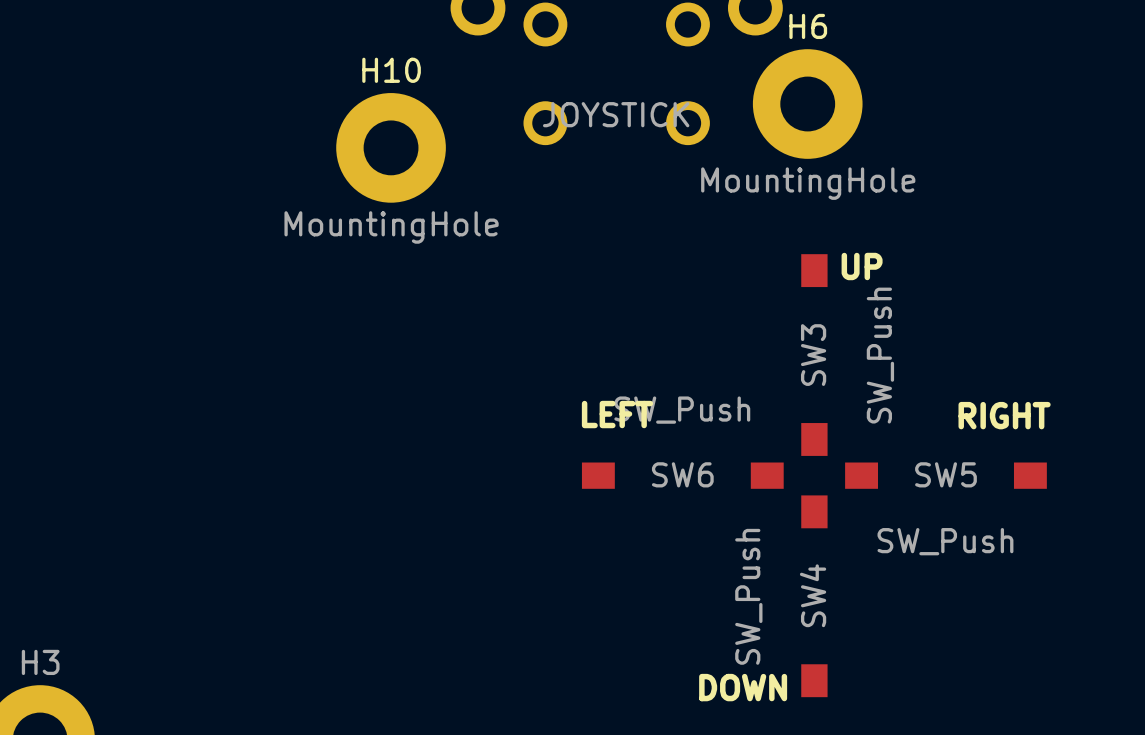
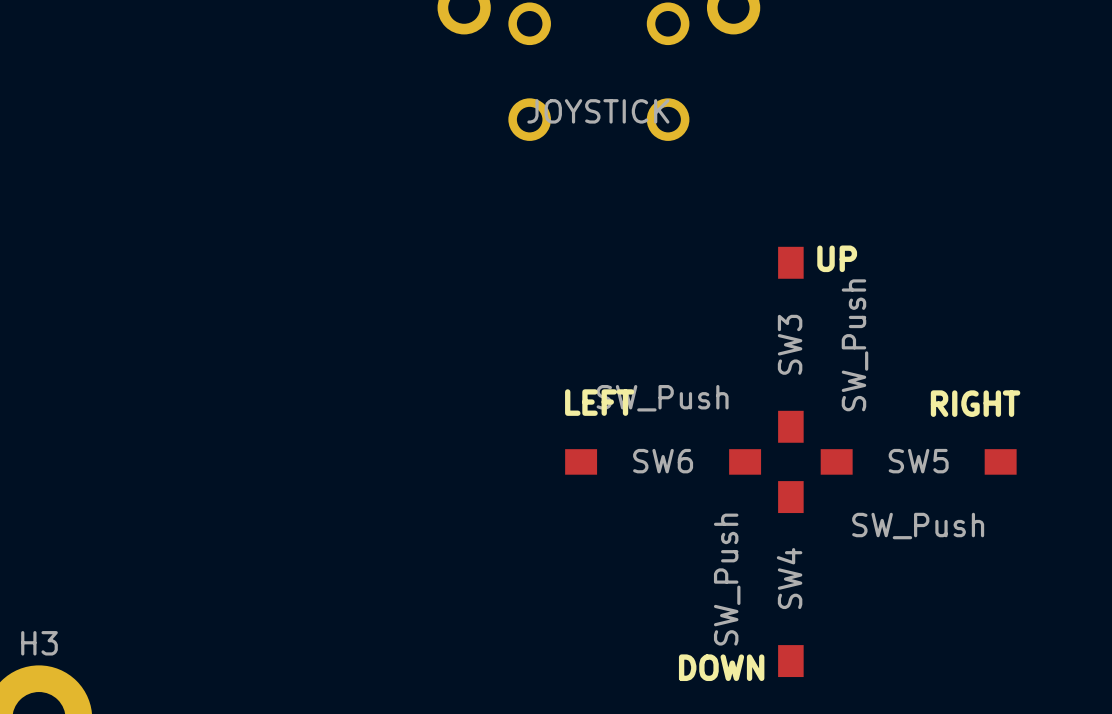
H6: MountingHole (807, 104) -> none
H10: MountingHole (391, 147) -> none

